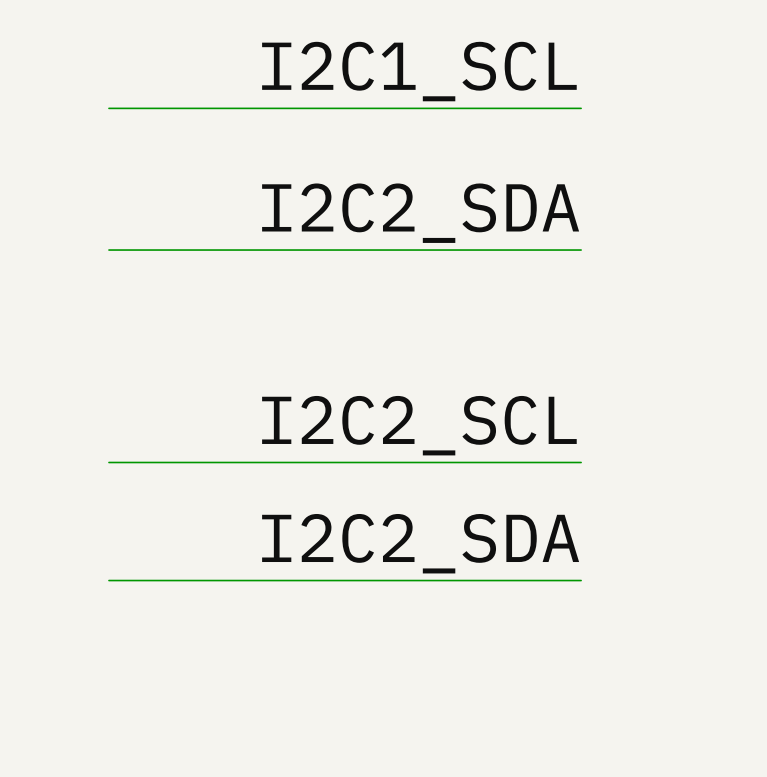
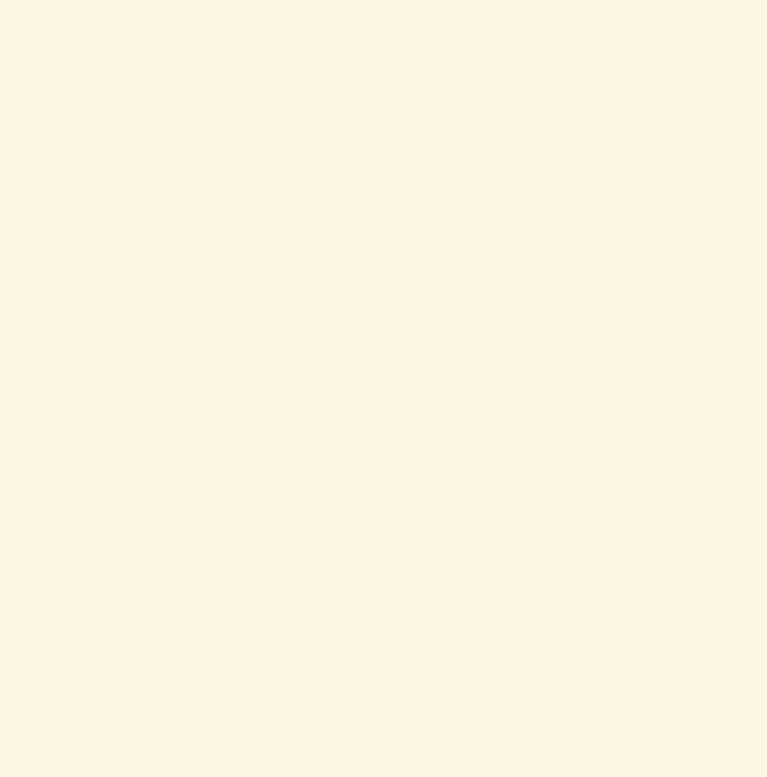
label: I2C1_SCL (419, 71) -> none
wire: (108, 108) (581, 108) -> none
label: I2C2_SDA (420, 213) -> none
wire: (108, 250) (581, 250) -> none
label: I2C2_SCL (419, 425) -> none
wire: (108, 462) (581, 462) -> none
label: I2C2_SDA (420, 543) -> none
wire: (108, 580) (581, 580) -> none

